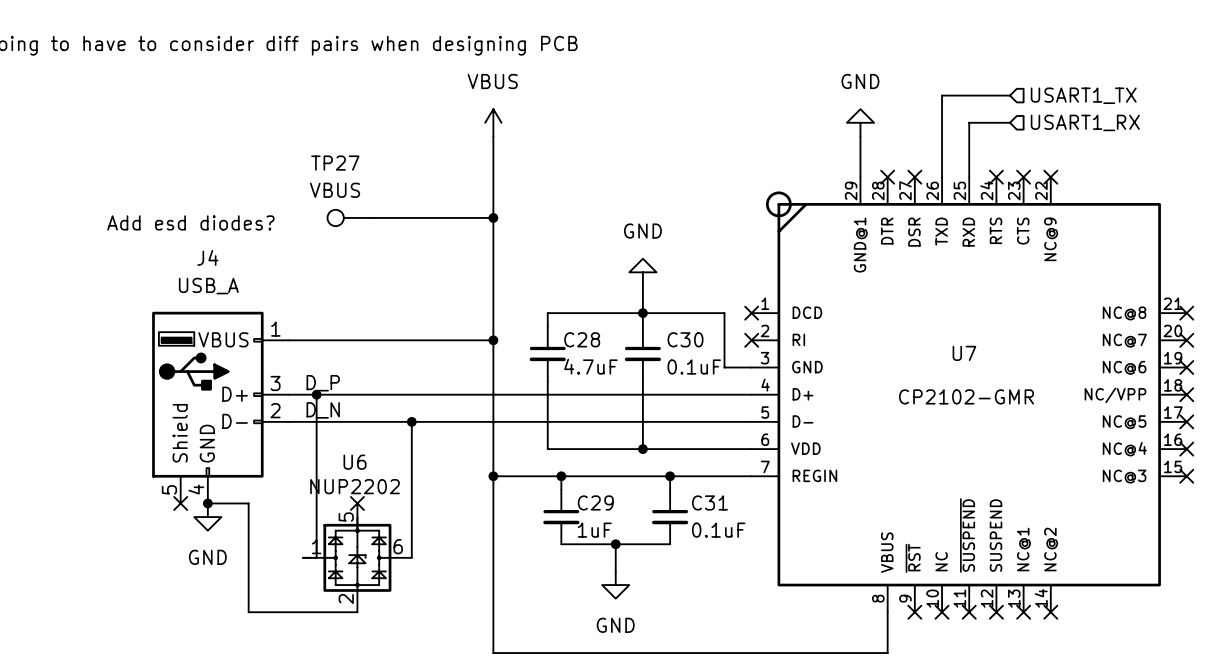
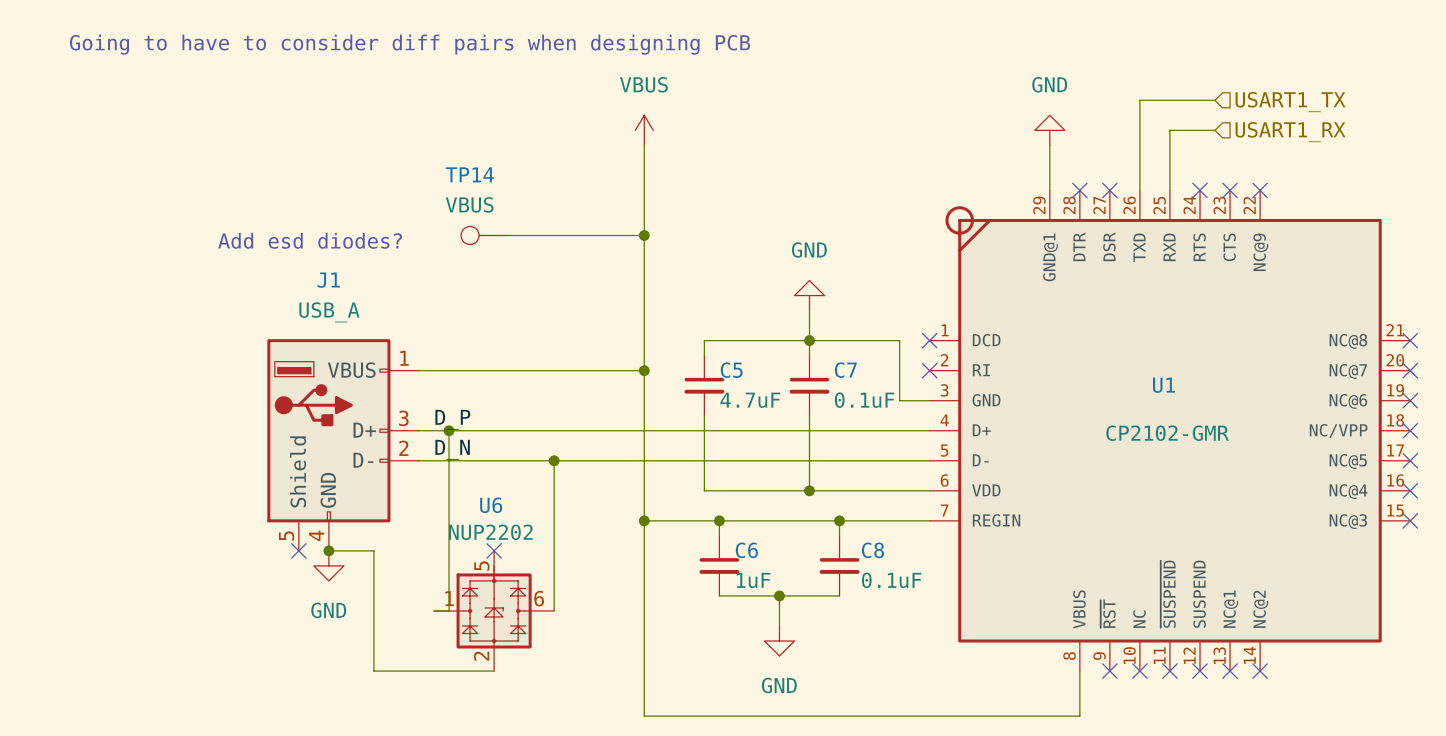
TP27 name: TP27 (335, 163) -> TP14 (469, 174)
J4 name: J4 (207, 257) -> J1 (328, 280)
C28 name: C28 (582, 339) -> C5 (731, 370)
C30 name: C30 (685, 339) -> C7 (845, 370)
U7 name: U7 (964, 353) -> U1 (1164, 385)
C29 name: C29 (595, 502) -> C6 (746, 550)
C31 name: C31 (709, 502) -> C8 (873, 550)

